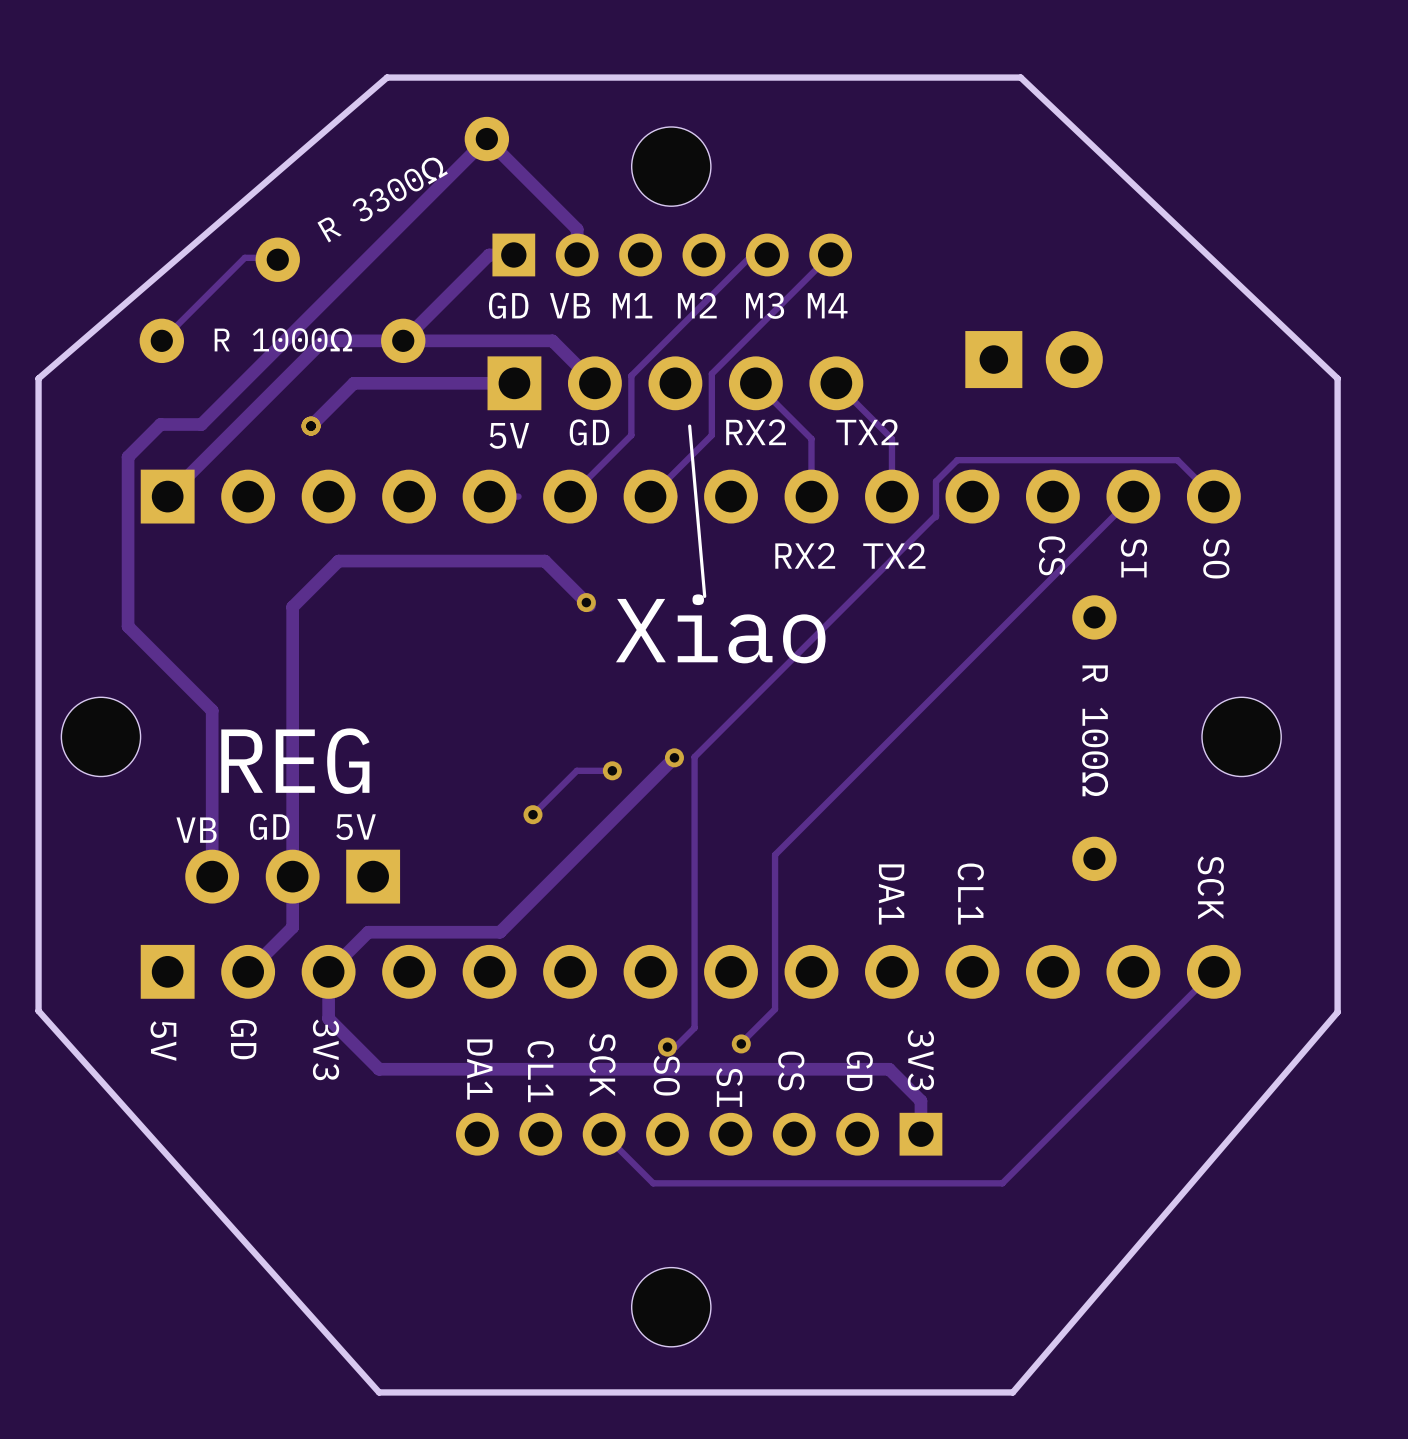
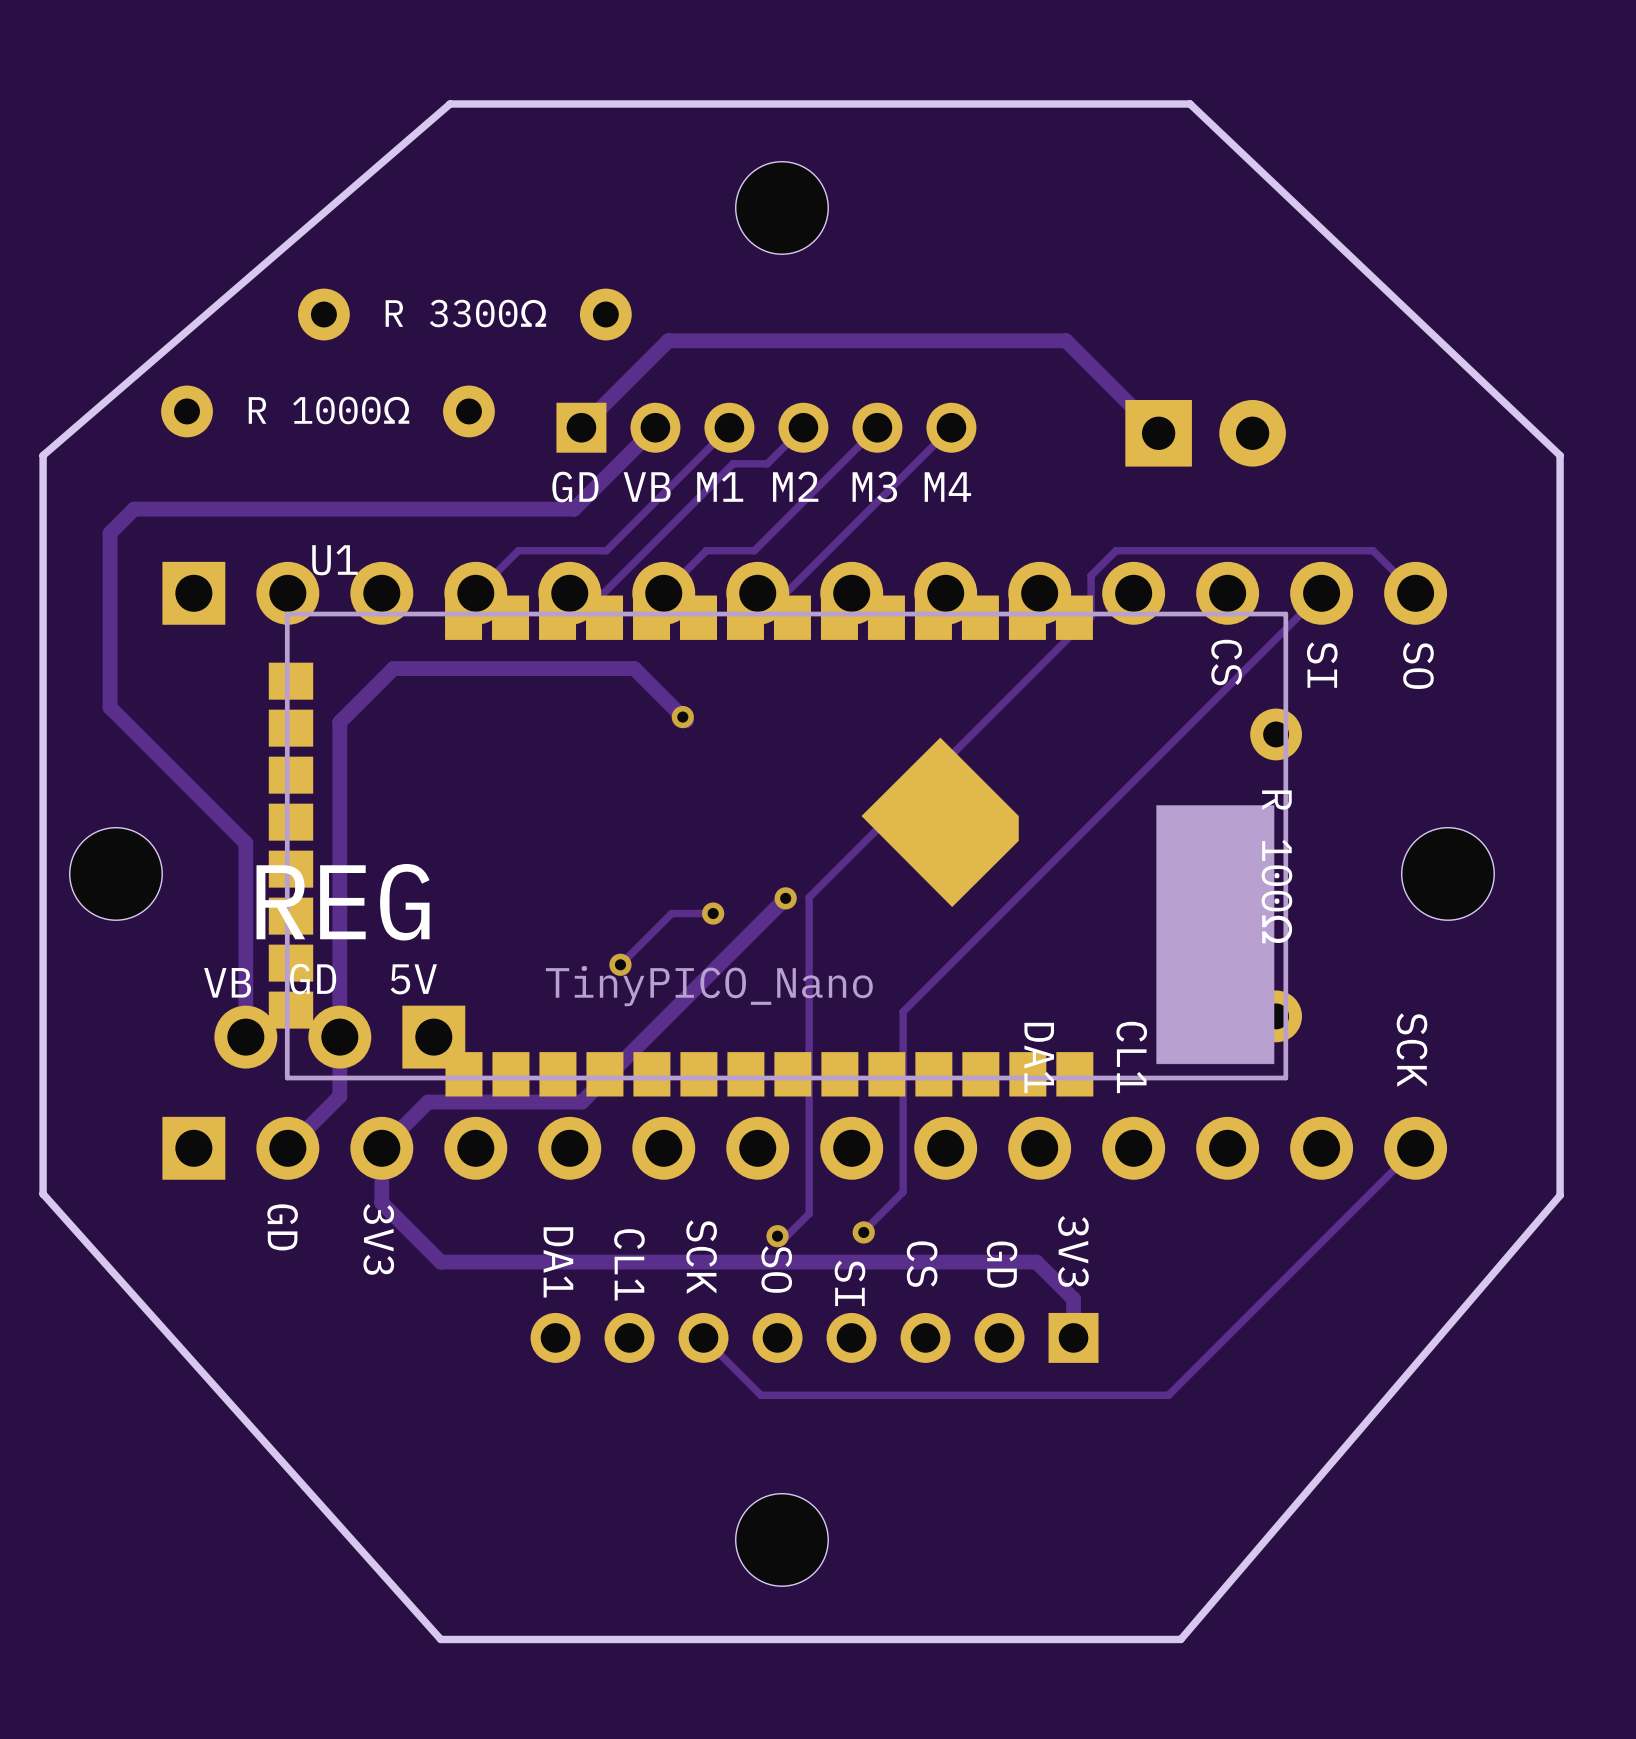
part: (382, 199) -> none
track: (513, 254) (489, 254) (403, 340) -> none
track: (577, 254) (577, 229) (486, 139) (201, 424) -> (655, 427) (574, 509) (233, 509)
part position: (672, 254) -> (766, 427)
track: (767, 254) (752, 254) (631, 375) (631, 435) (606, 460) -> (877, 427) (754, 550) (706, 550)
track: (830, 254) (711, 373) (711, 435) (650, 496) -> none
track: (279, 257) (244, 257) (161, 340) -> none
part: none -> (464, 314)
text: GD (508, 305) -> none
text position: VB (570, 305) -> VB (647, 487)
text position: M1 (632, 305) -> M1 (720, 487)
text position: M2 (697, 305) -> M2 (795, 486)
text position: M3 (765, 305) -> M3 (874, 487)
text position: M4 (827, 305) -> M4 (947, 487)
track: none -> (581, 427) (668, 340) (1066, 340) (1158, 433)
track: none -> (729, 427) (606, 550) (518, 550) (475, 593)
track: none -> (803, 427) (767, 463) (733, 463) (603, 593)
track: none -> (951, 427) (785, 593)
track: (514, 383) (353, 383) (311, 426) -> none
track: (594, 383) (552, 340) (323, 340) (167, 496) -> none
part: (675, 383) -> none
track: (755, 383) (811, 438) (811, 496) -> none
track: (836, 383) (891, 438) (891, 496) -> none
text: none -> GD (575, 487)
track: (160, 424) (128, 456) (128, 626) -> (185, 509) (134, 509) (110, 533) (110, 707) (147, 745)
via: (311, 426) -> none
line: (689, 426) (704, 596) -> none
text: GD (589, 432) -> none
text: RX2 (756, 432) -> none
text: TX2 (867, 432) -> none
text: 5V (509, 435) -> none
text: RX2 (805, 555) -> none
text: TX2 (894, 555) -> none
text: Xiao (720, 628) -> none
U1: none -> TinyPICO_Nano (778, 846)
text: 5V (163, 1041) -> none

